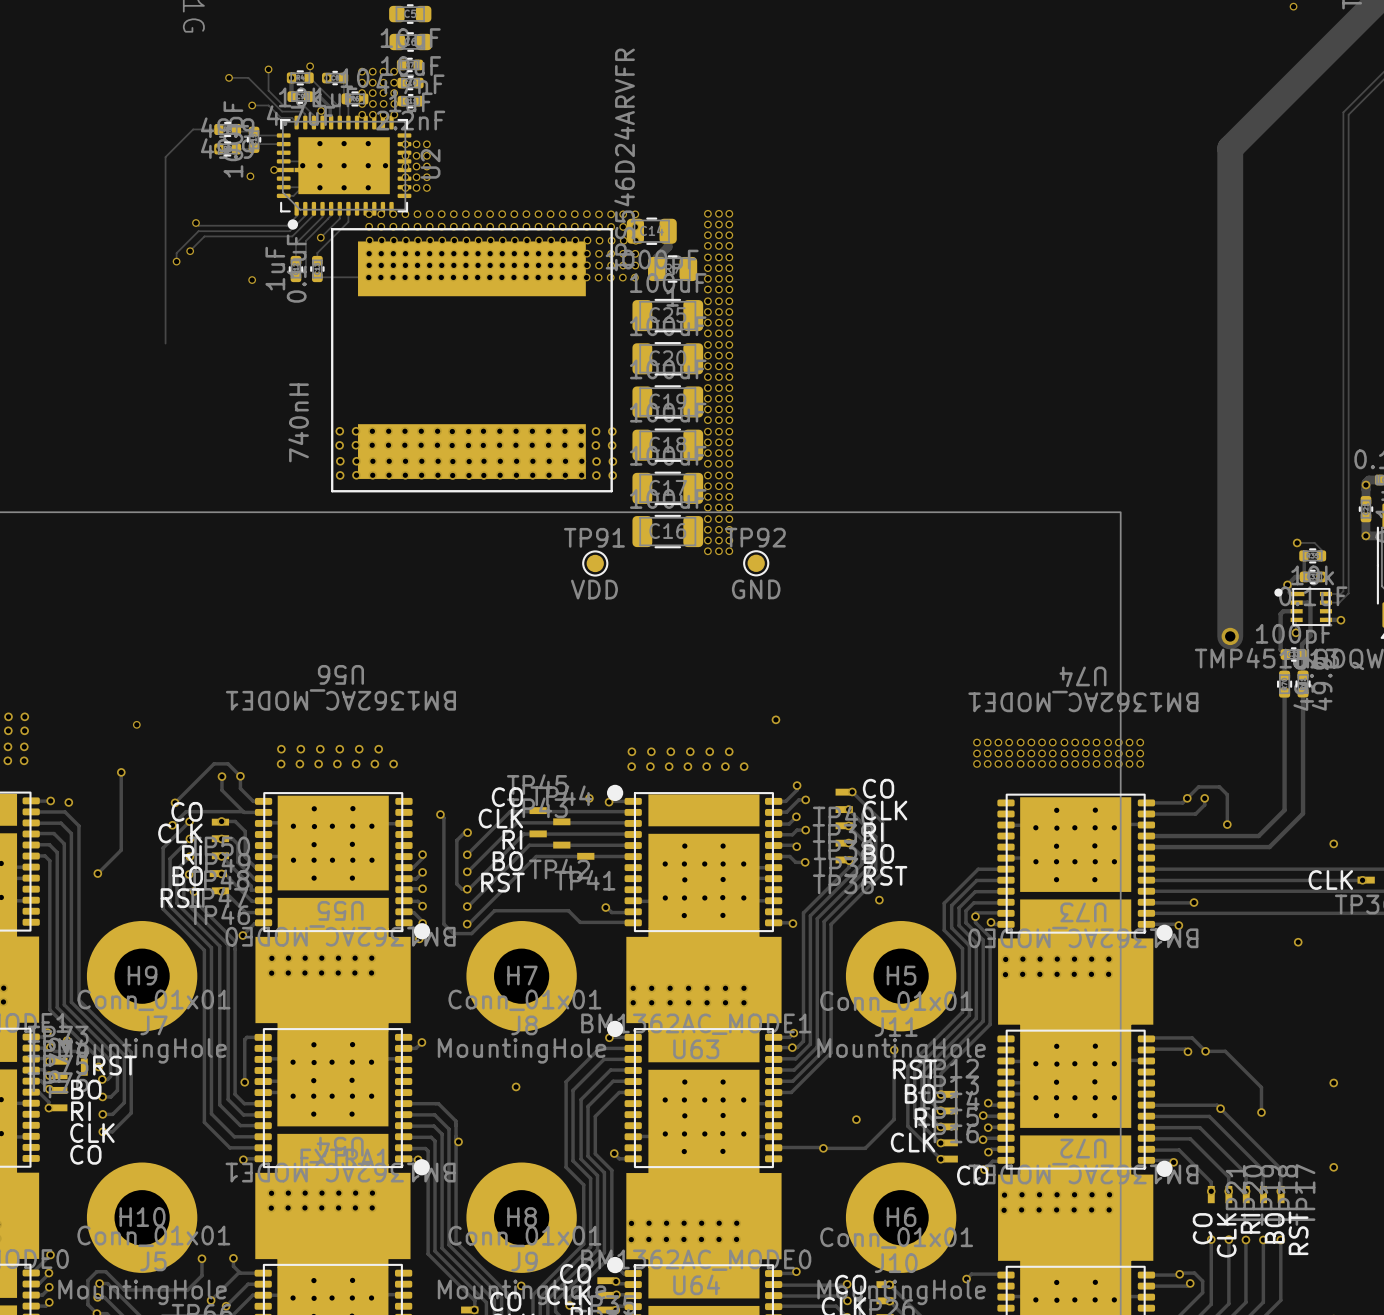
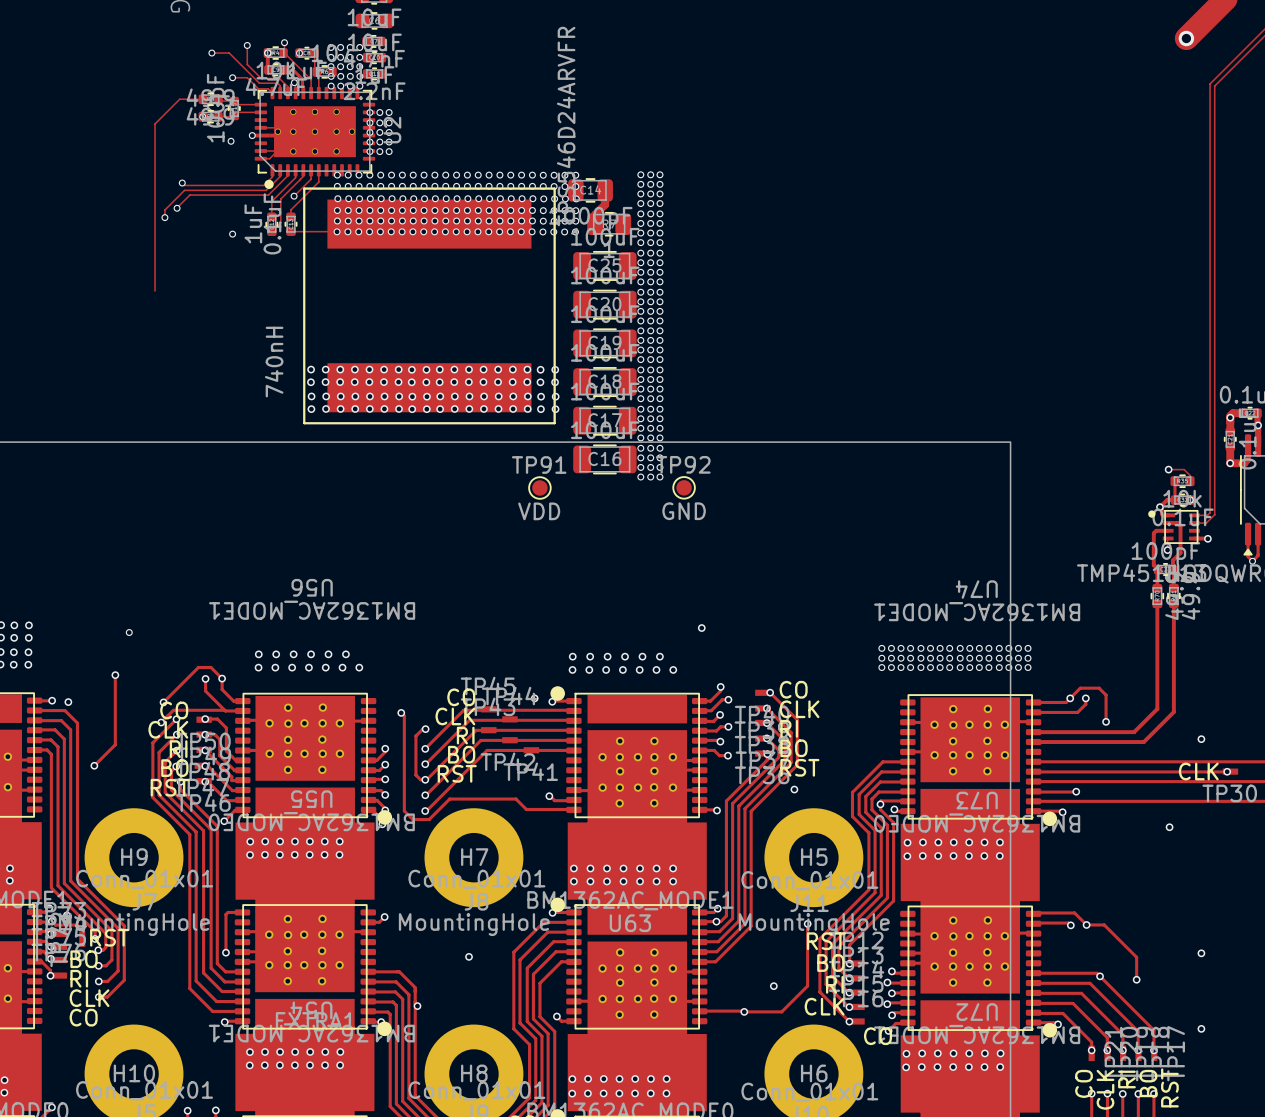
track: (1317, 61) (1230, 148) (1230, 636) -> none
via: none -> (1186, 38)
via: (1230, 636) -> none

